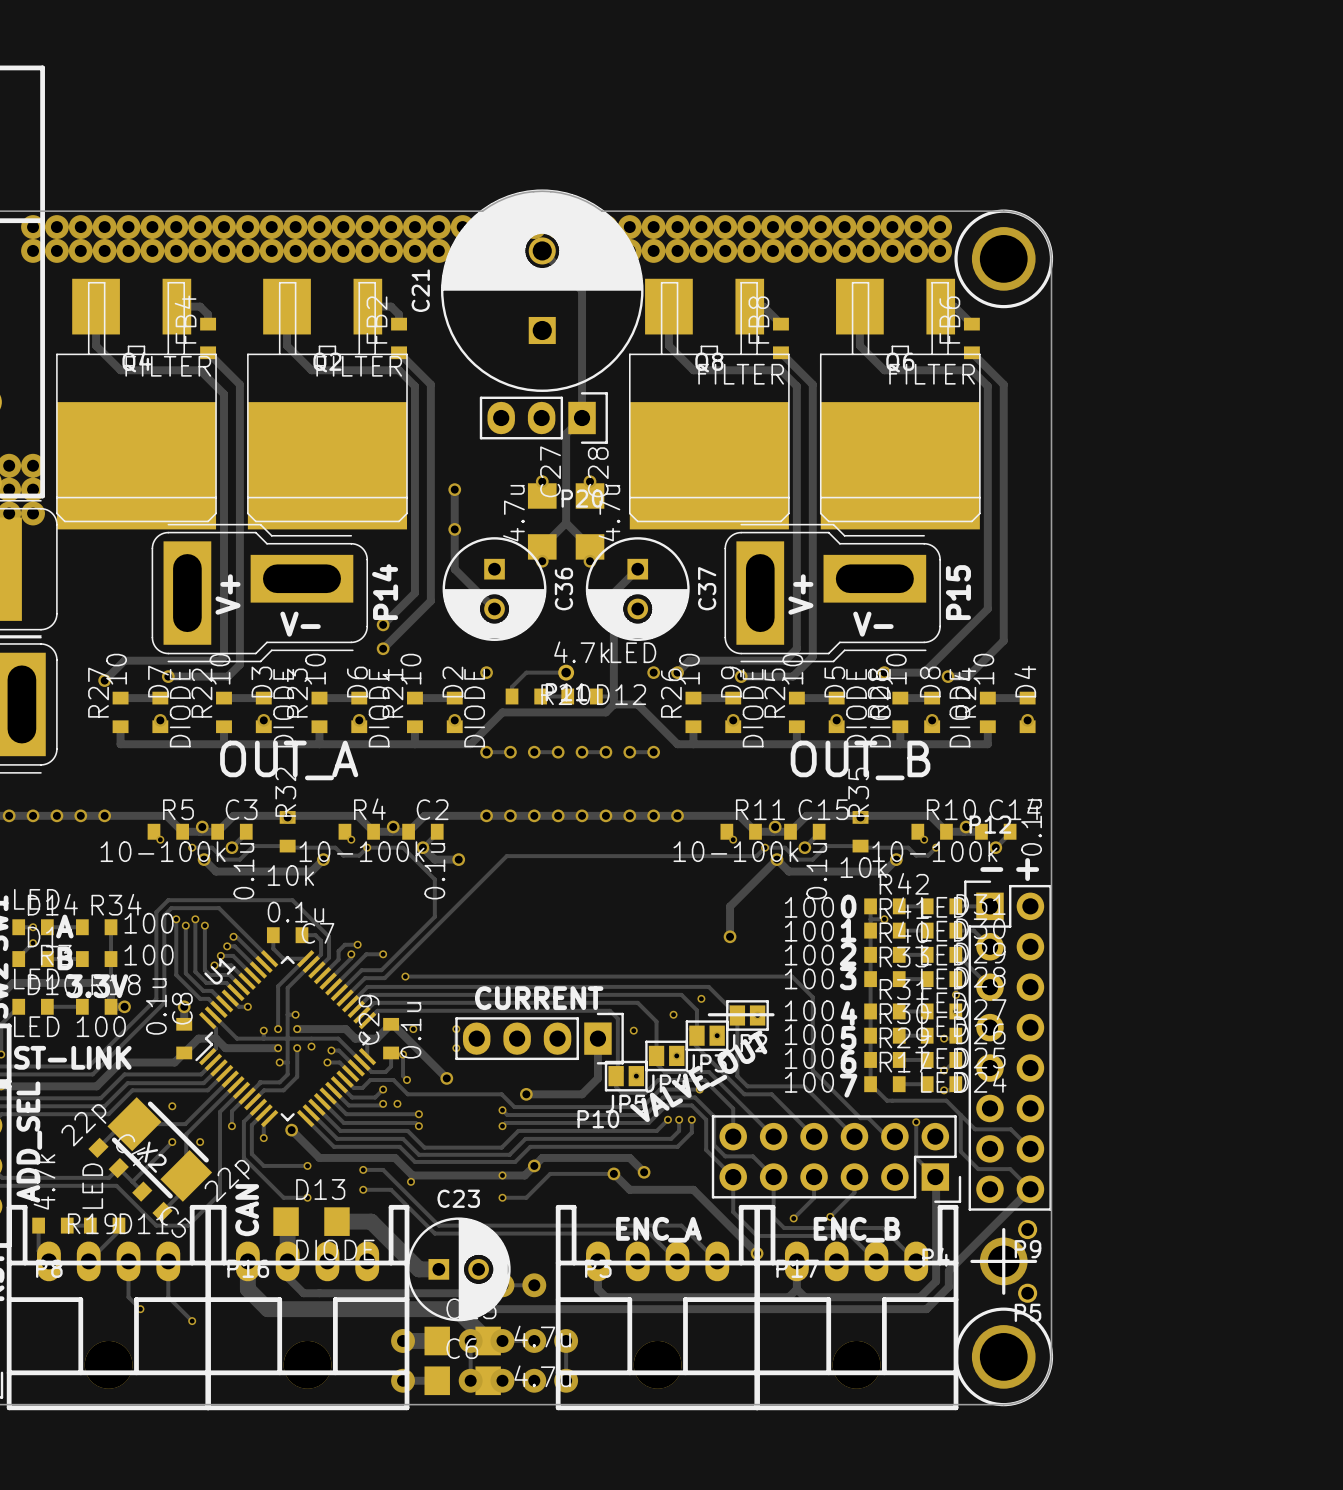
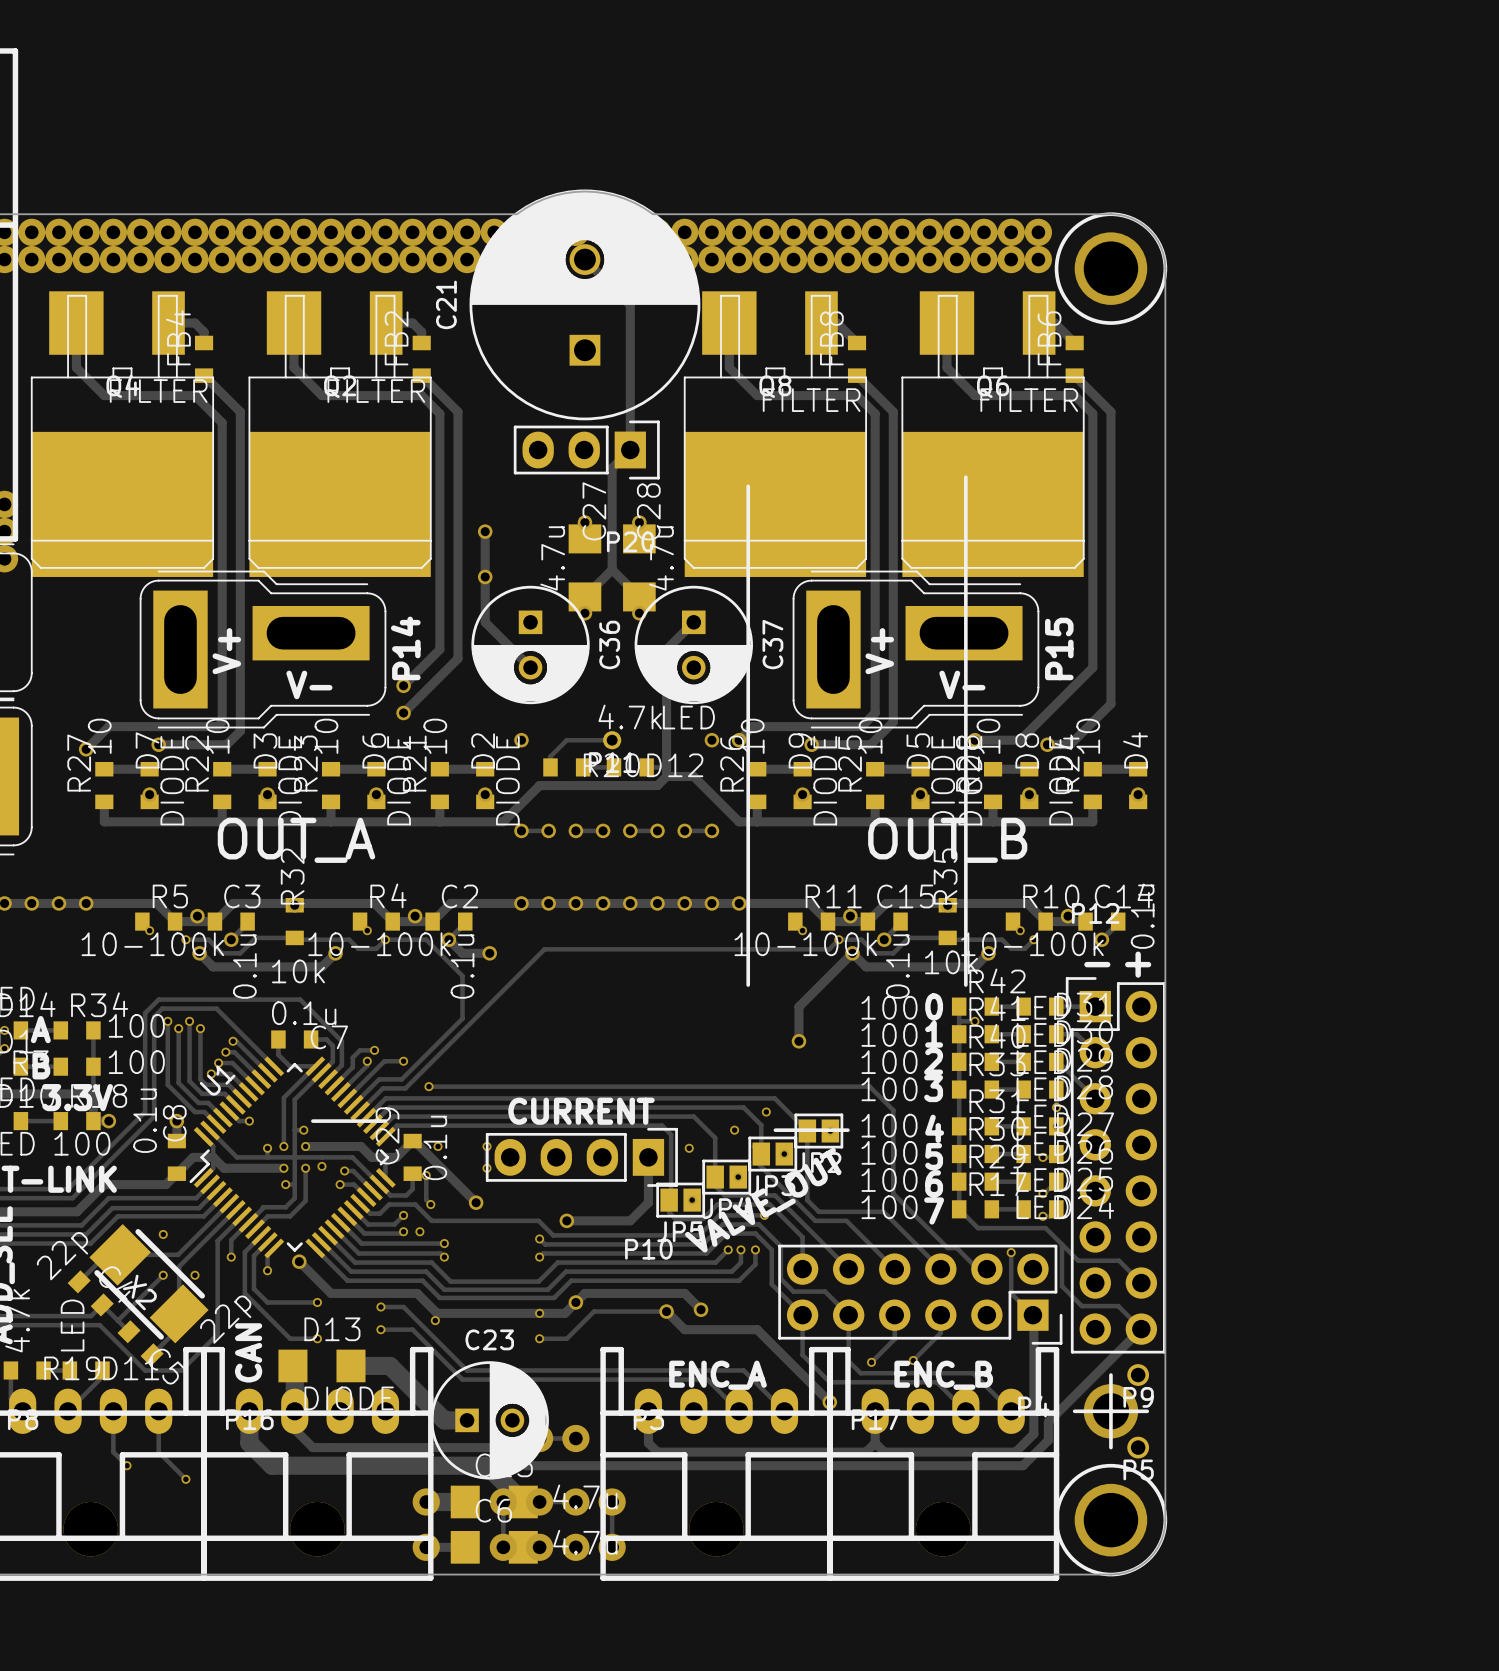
line: none -> (965, 477) (965, 985)
line: none -> (748, 486) (748, 985)
line: none -> (312, 1121) (385, 1121)

